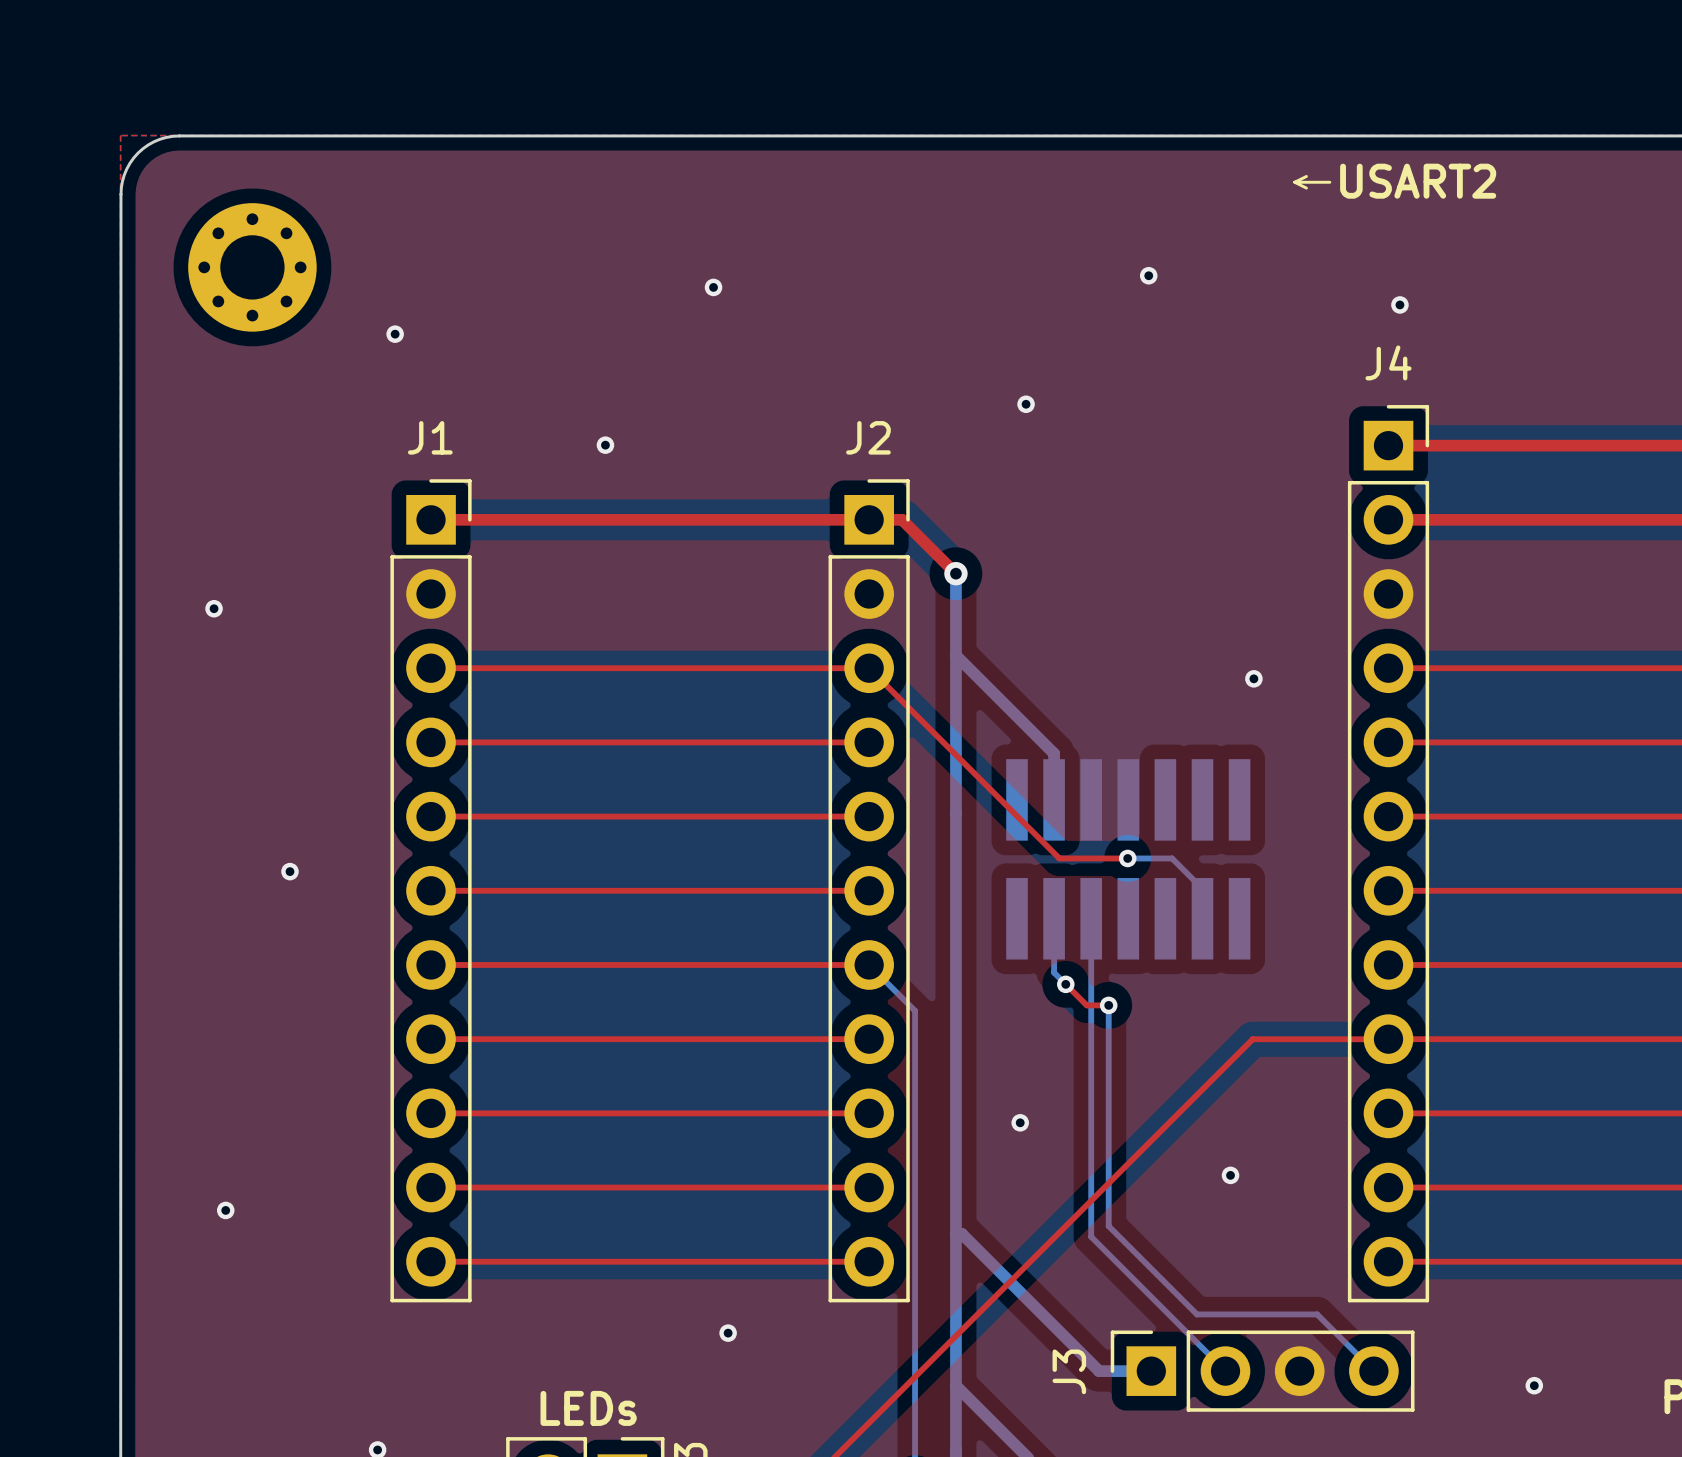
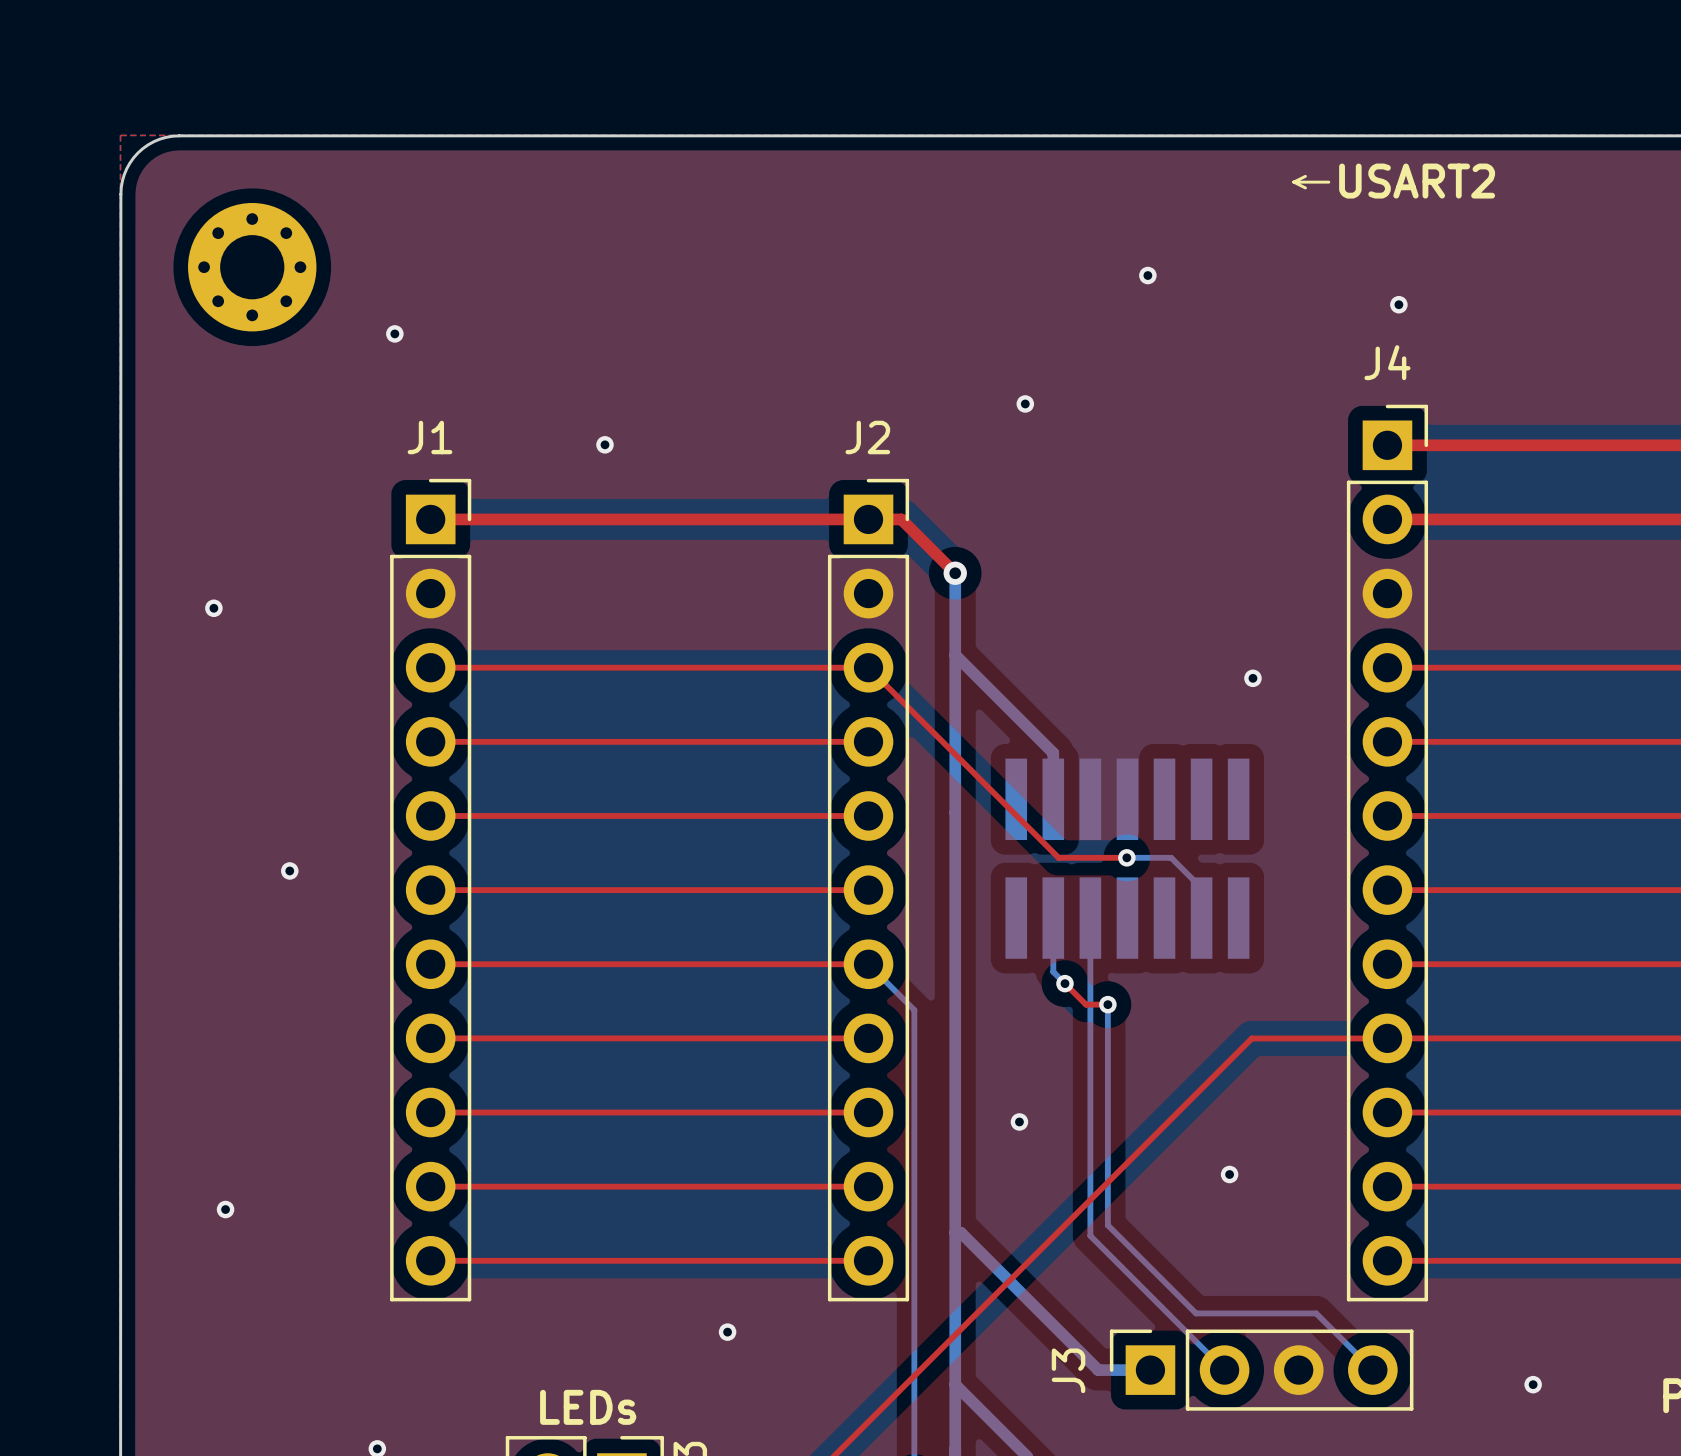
via: (713, 287) -> none

